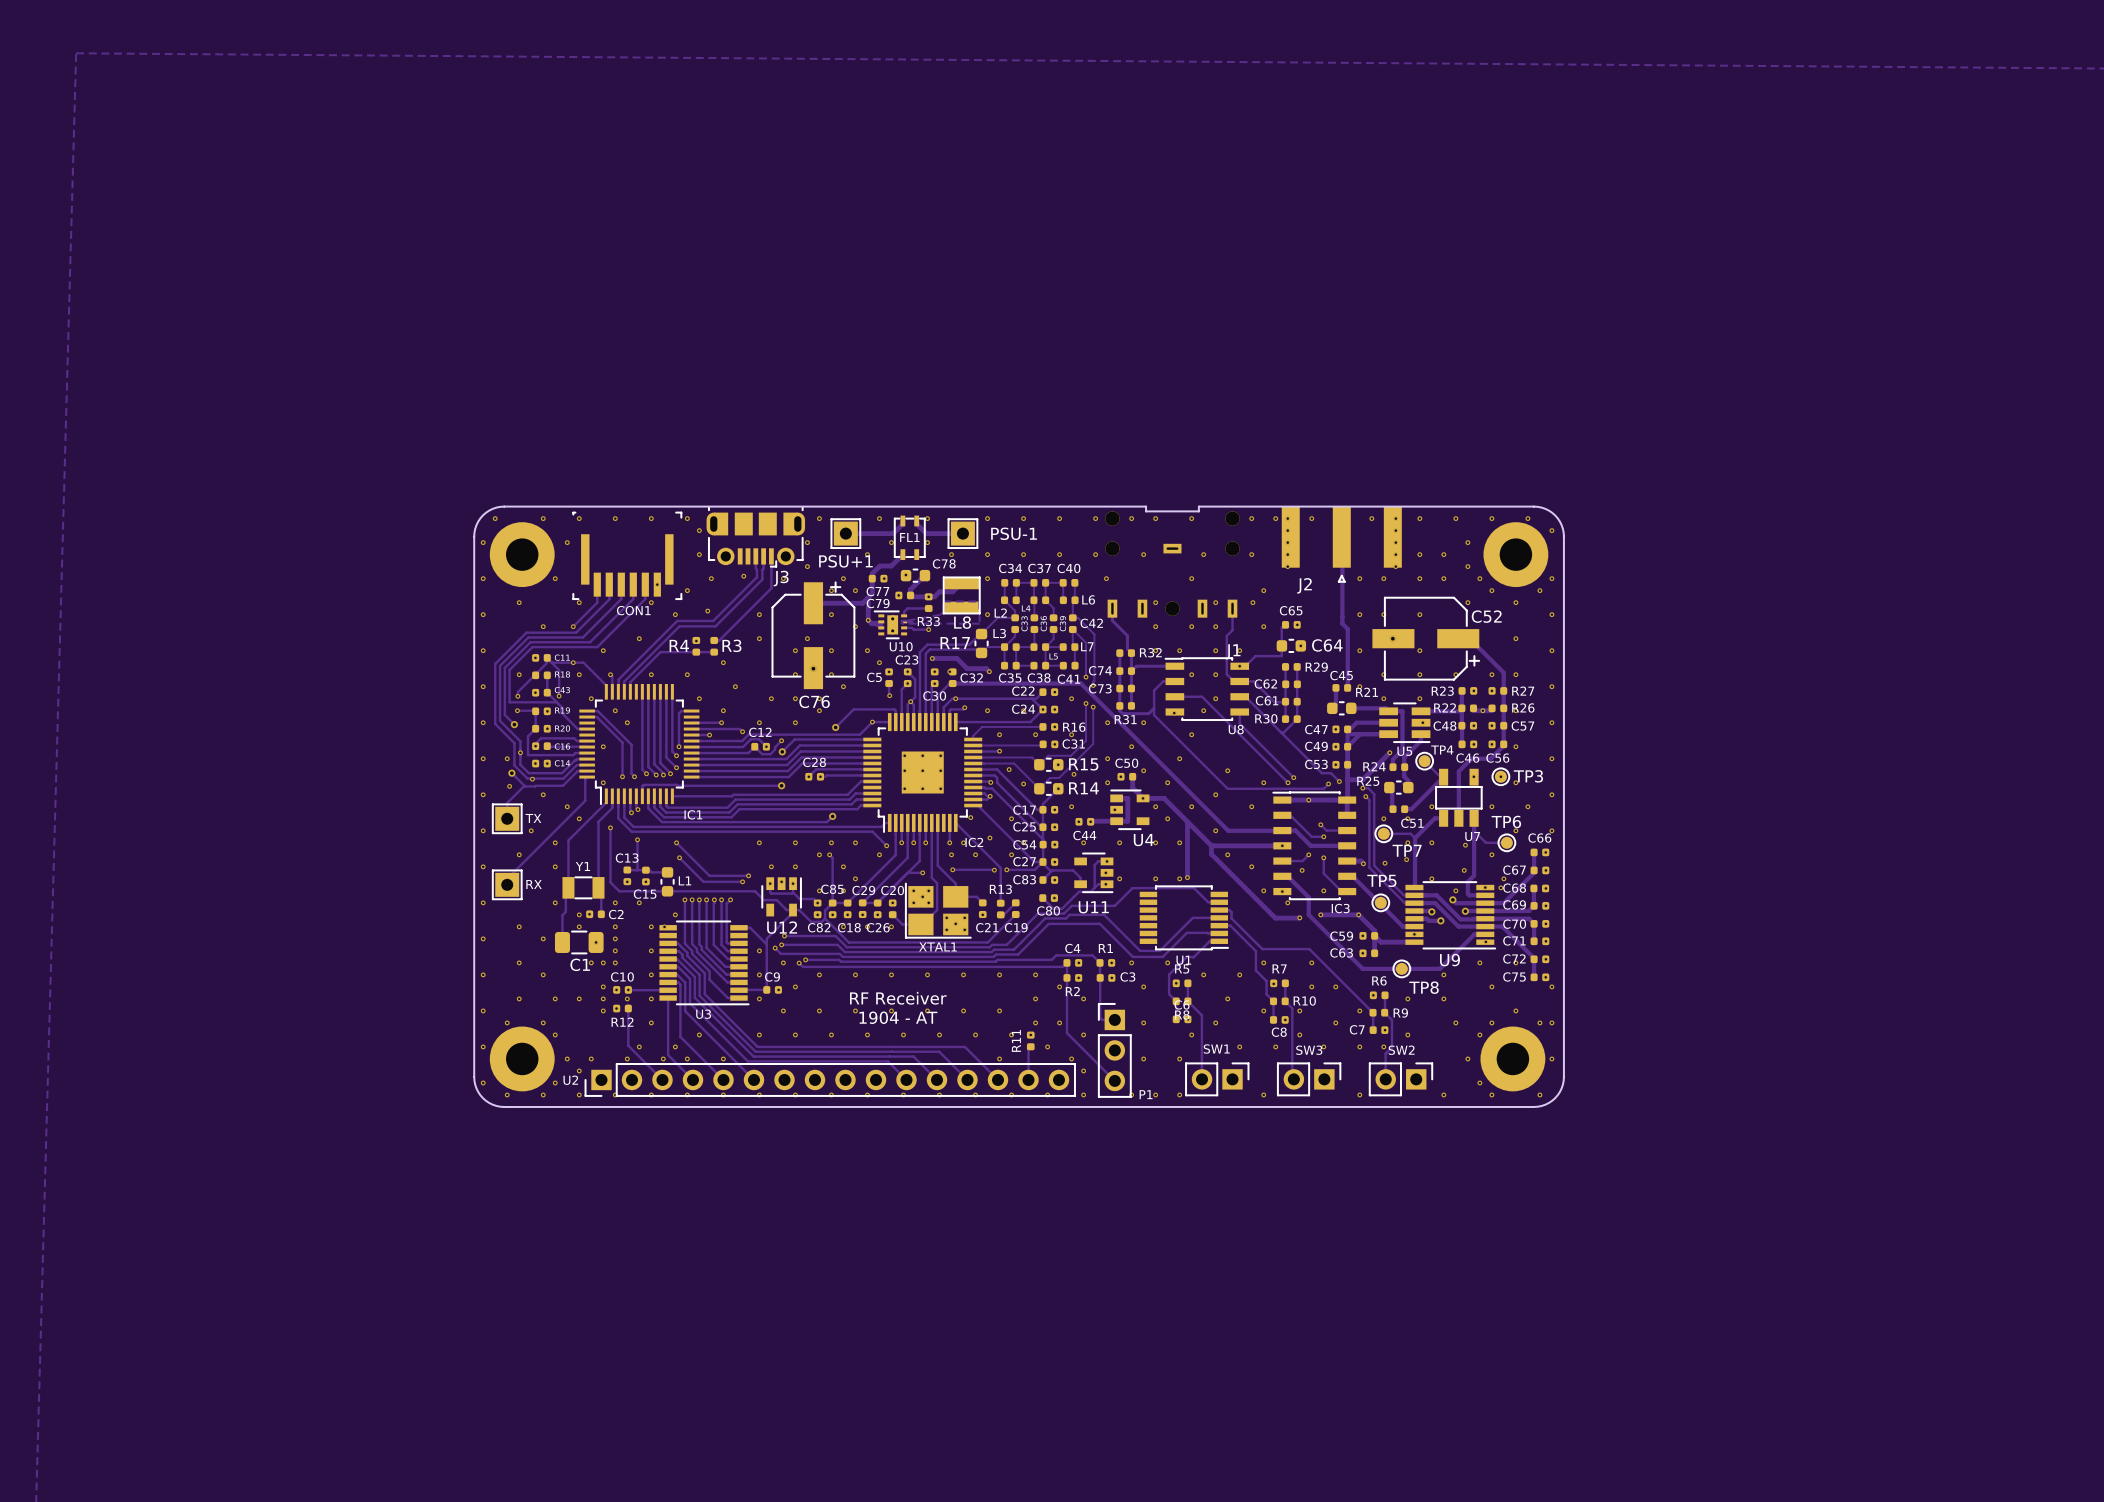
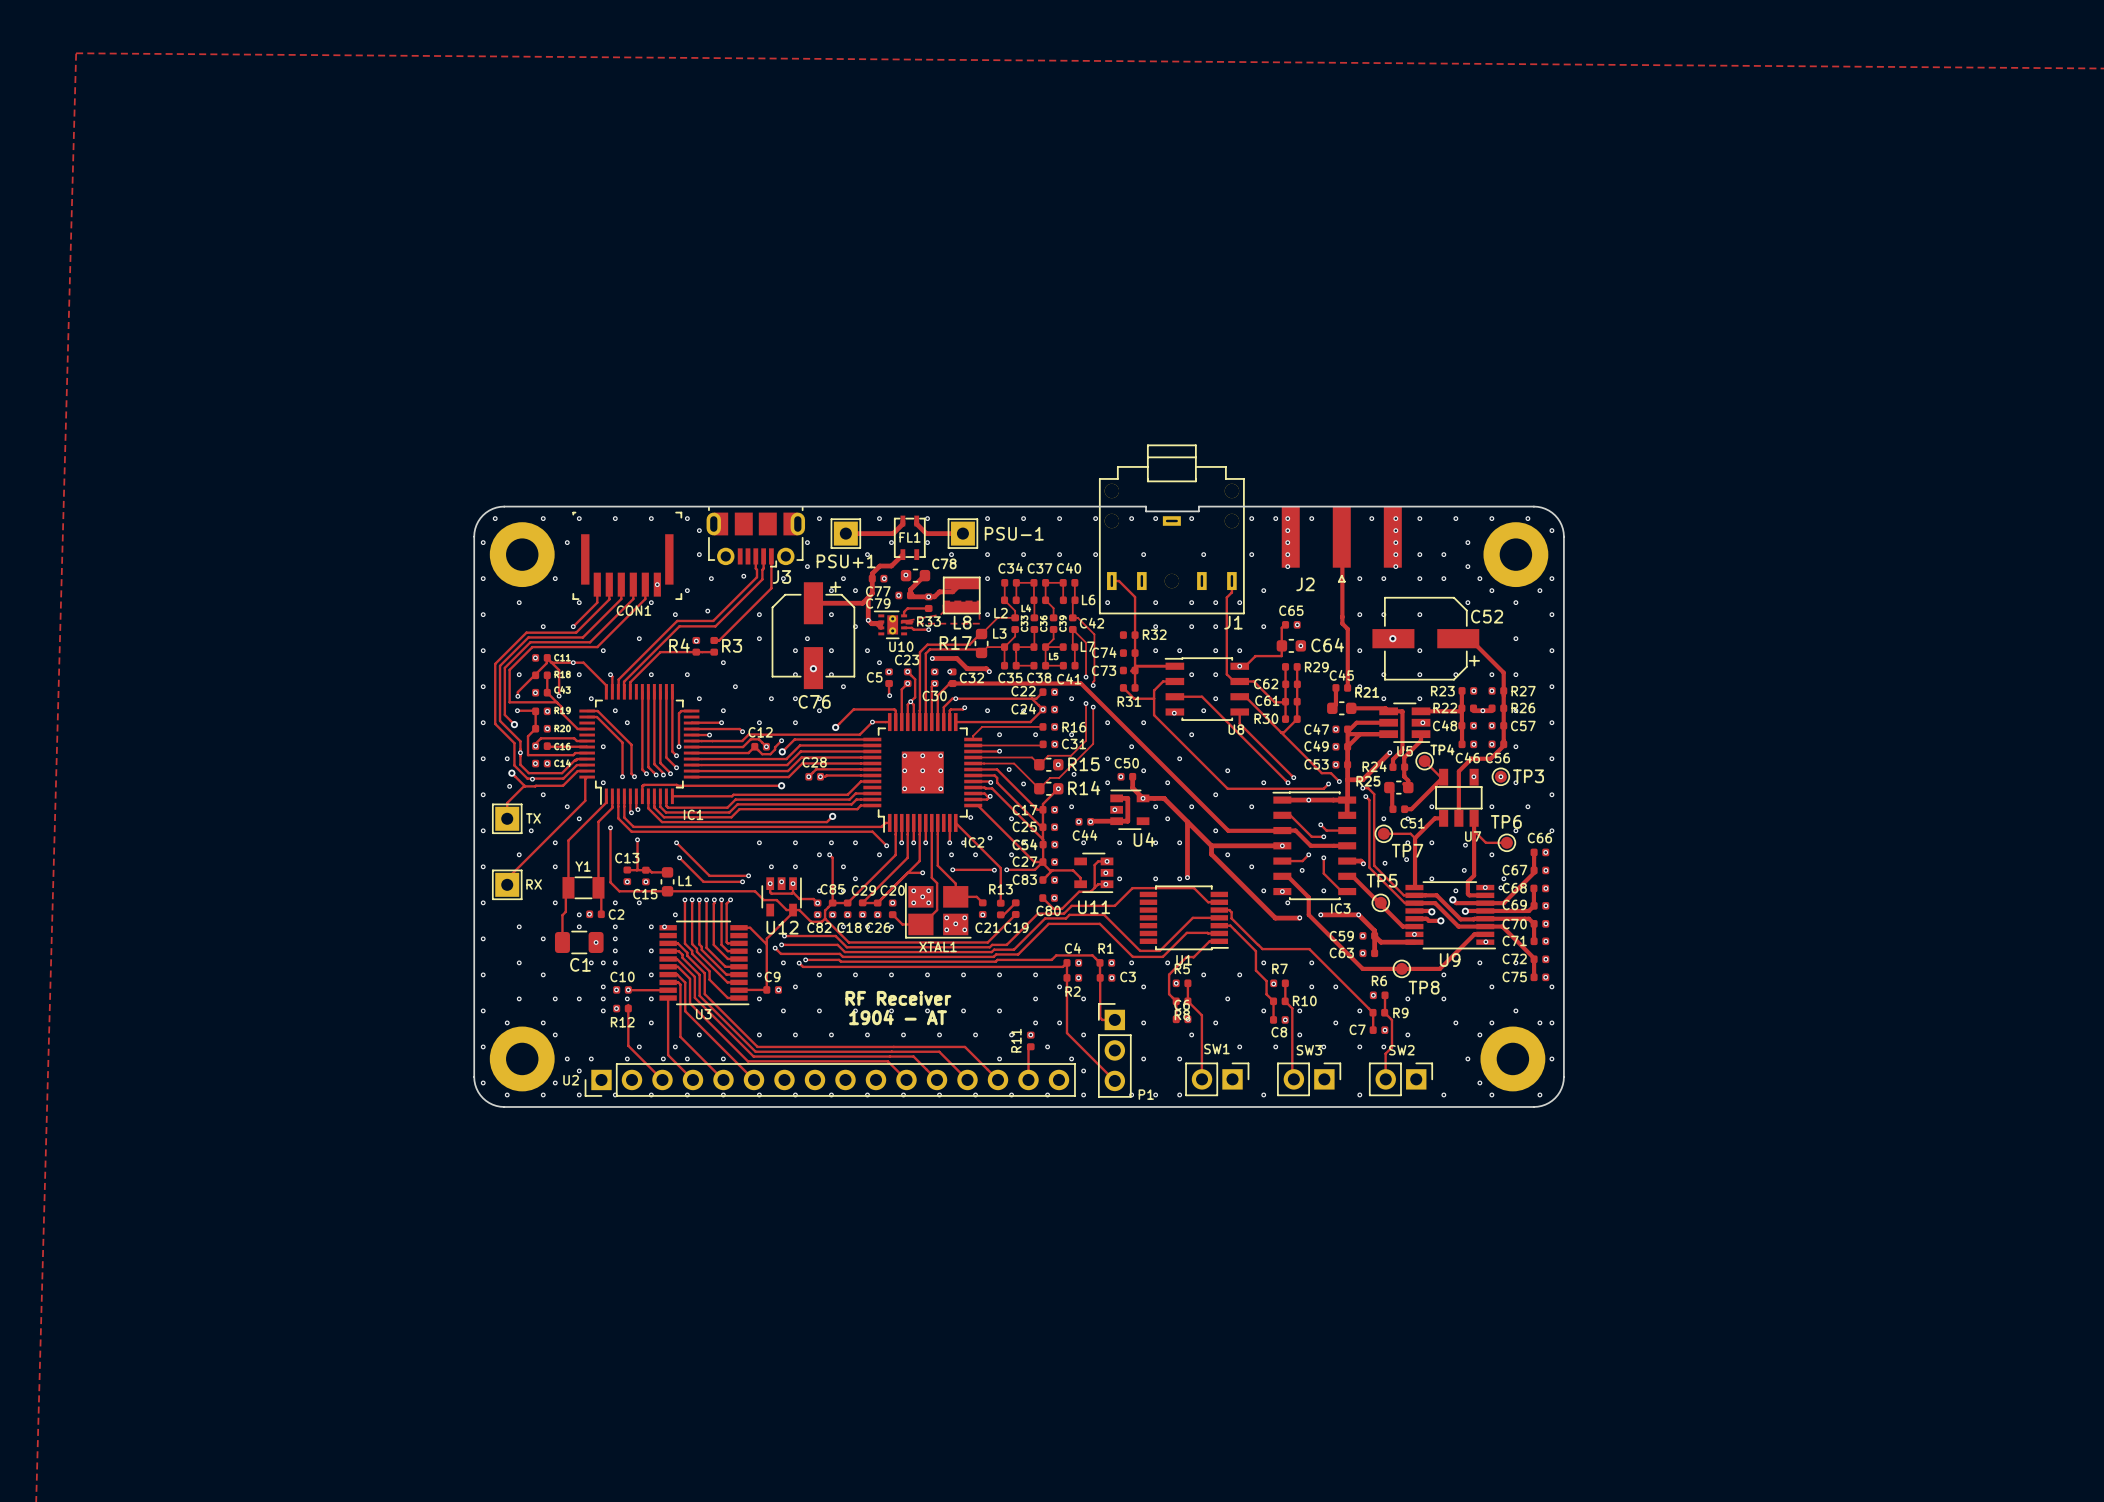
J1 footprint: [1105, 511, 1240, 618] -> [1098, 444, 1245, 615]
via position: (1106, 578) -> (1107, 602)
via position: (1191, 578) -> (1191, 602)
track: none -> (1111, 581) (1119, 581) (1135, 597) (1135, 687)
via position: (1252, 602) -> (1239, 602)
track: (1112, 608) (1112, 620) (1127, 635) (1127, 649) (1131, 653) (1131, 705) -> none
track: (1232, 608) (1232, 630) (1226, 635) -> (1231, 581) (1231, 592) (1226, 597) (1226, 635)
track: (1119, 653) (1119, 710) (1122, 713) (1148, 713) (1154, 708) -> none
R32 position: (1125, 653) -> (1129, 635)
C74 position: (1125, 671) -> (1129, 653)
track: none -> (1123, 687) (1134, 698) (1154, 698)
C73 position: (1125, 688) -> (1129, 670)
R31 position: (1125, 705) -> (1129, 687)

